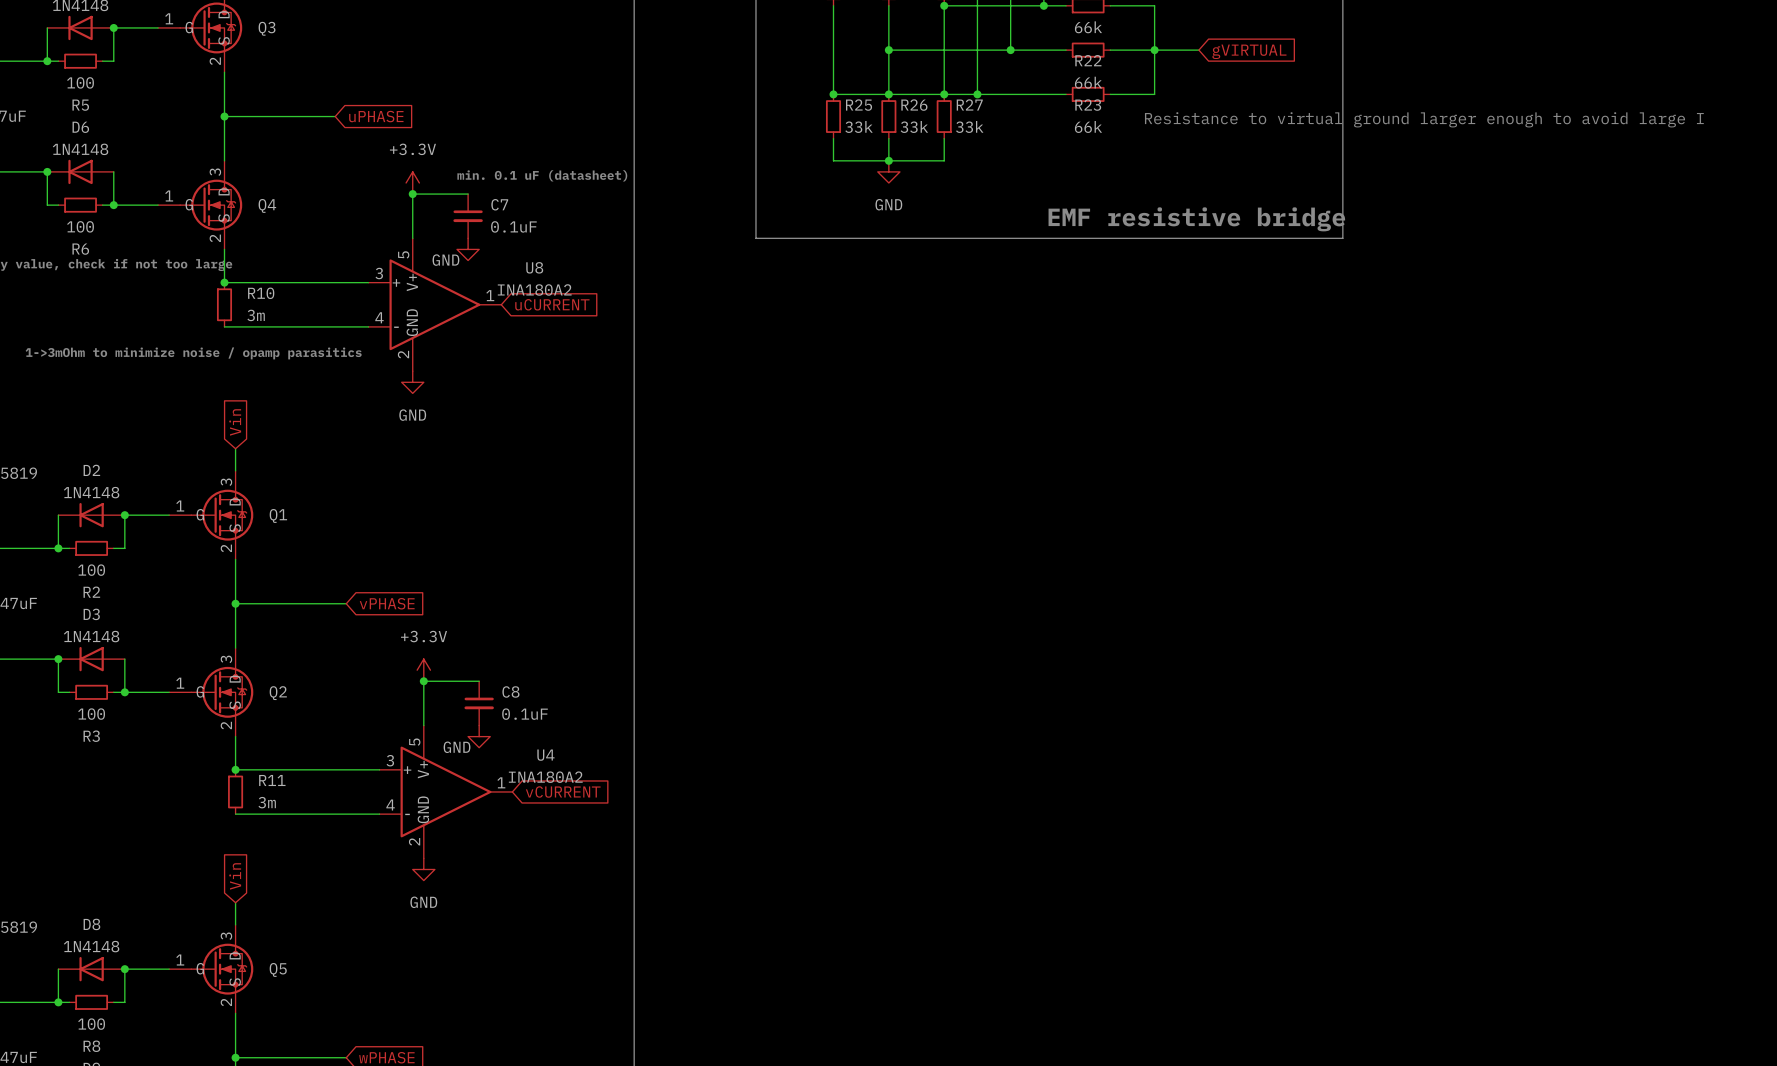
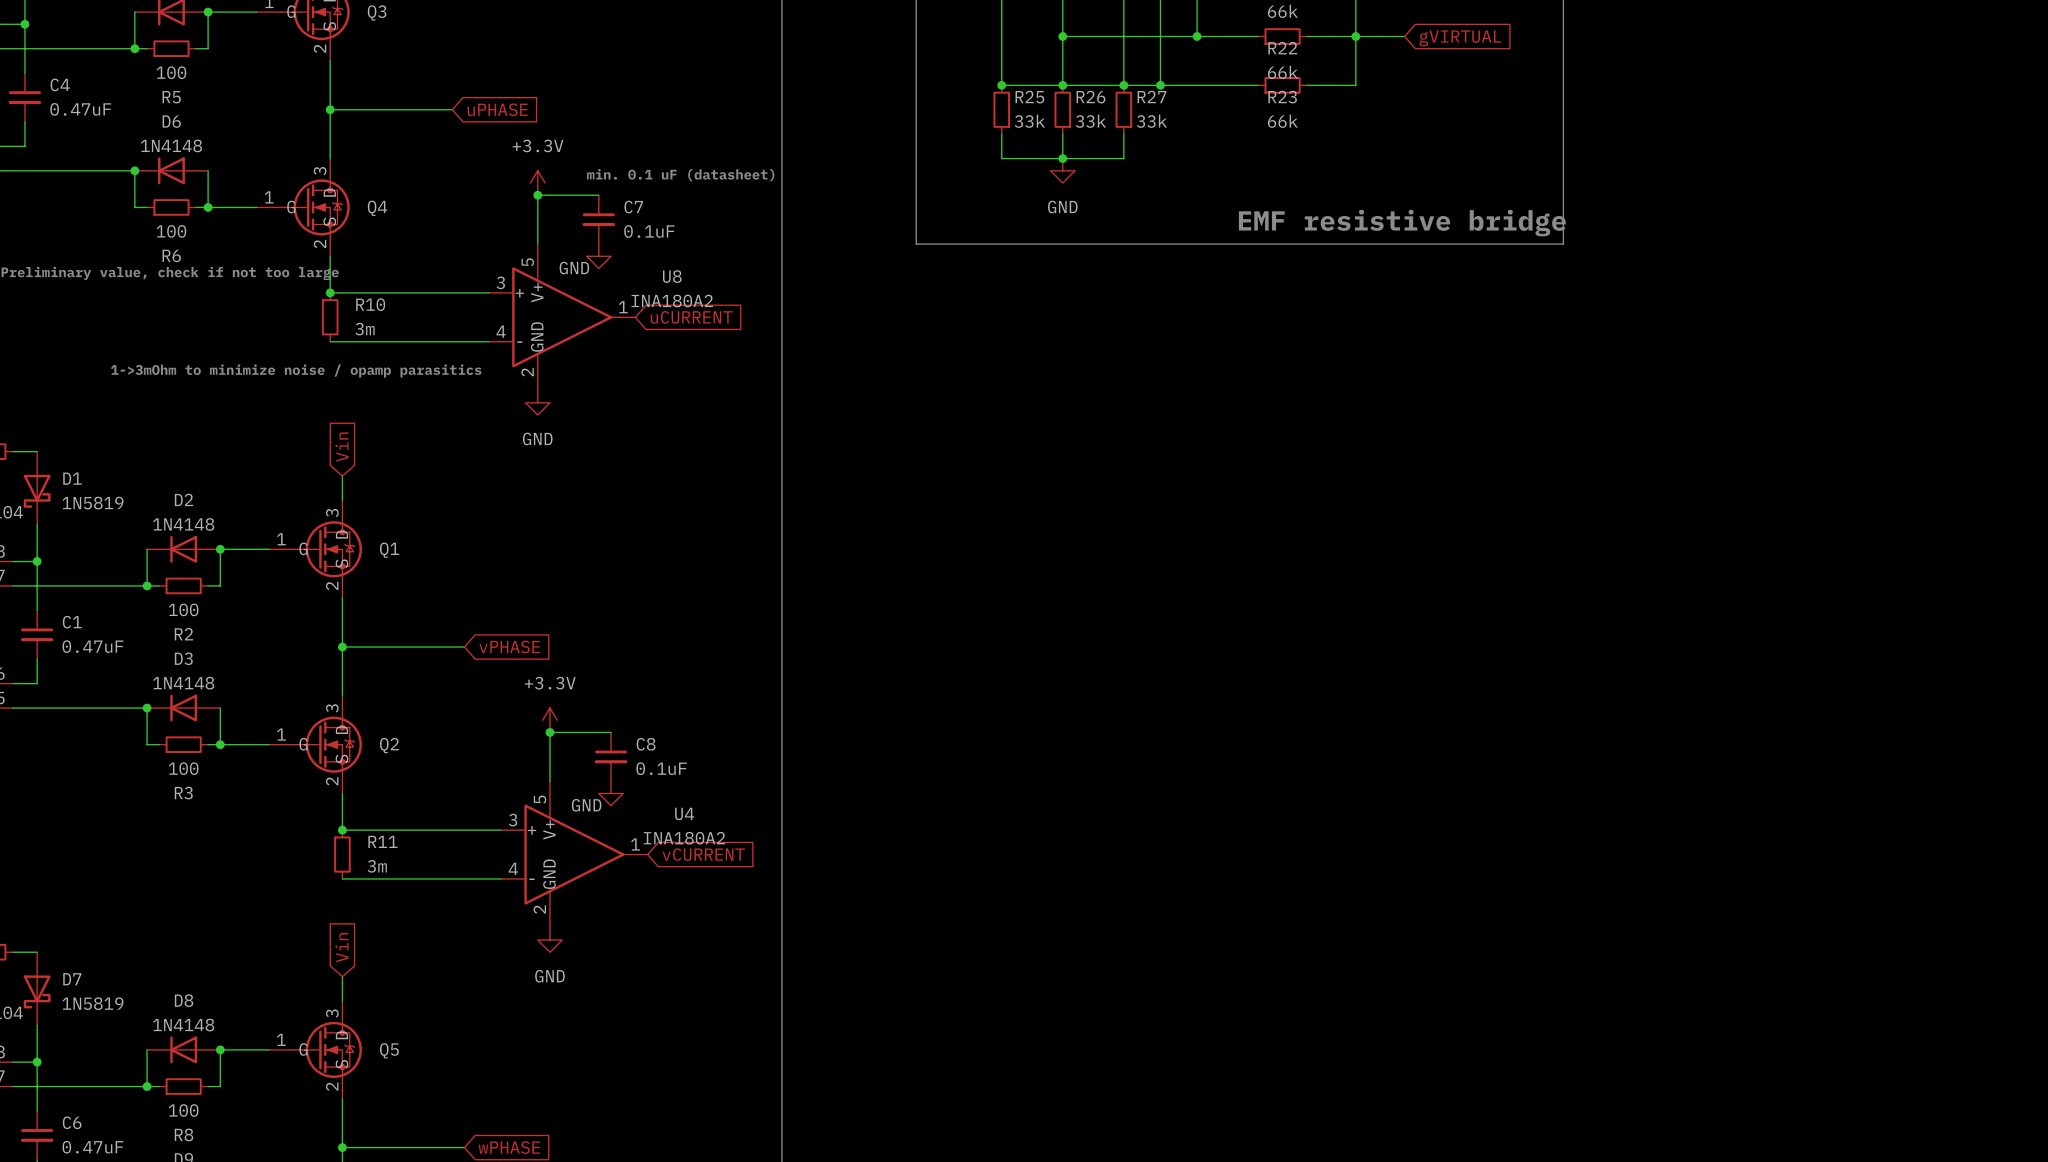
text: Resistance to virtual ground larger enough to avoid large I (1424, 119) -> none

